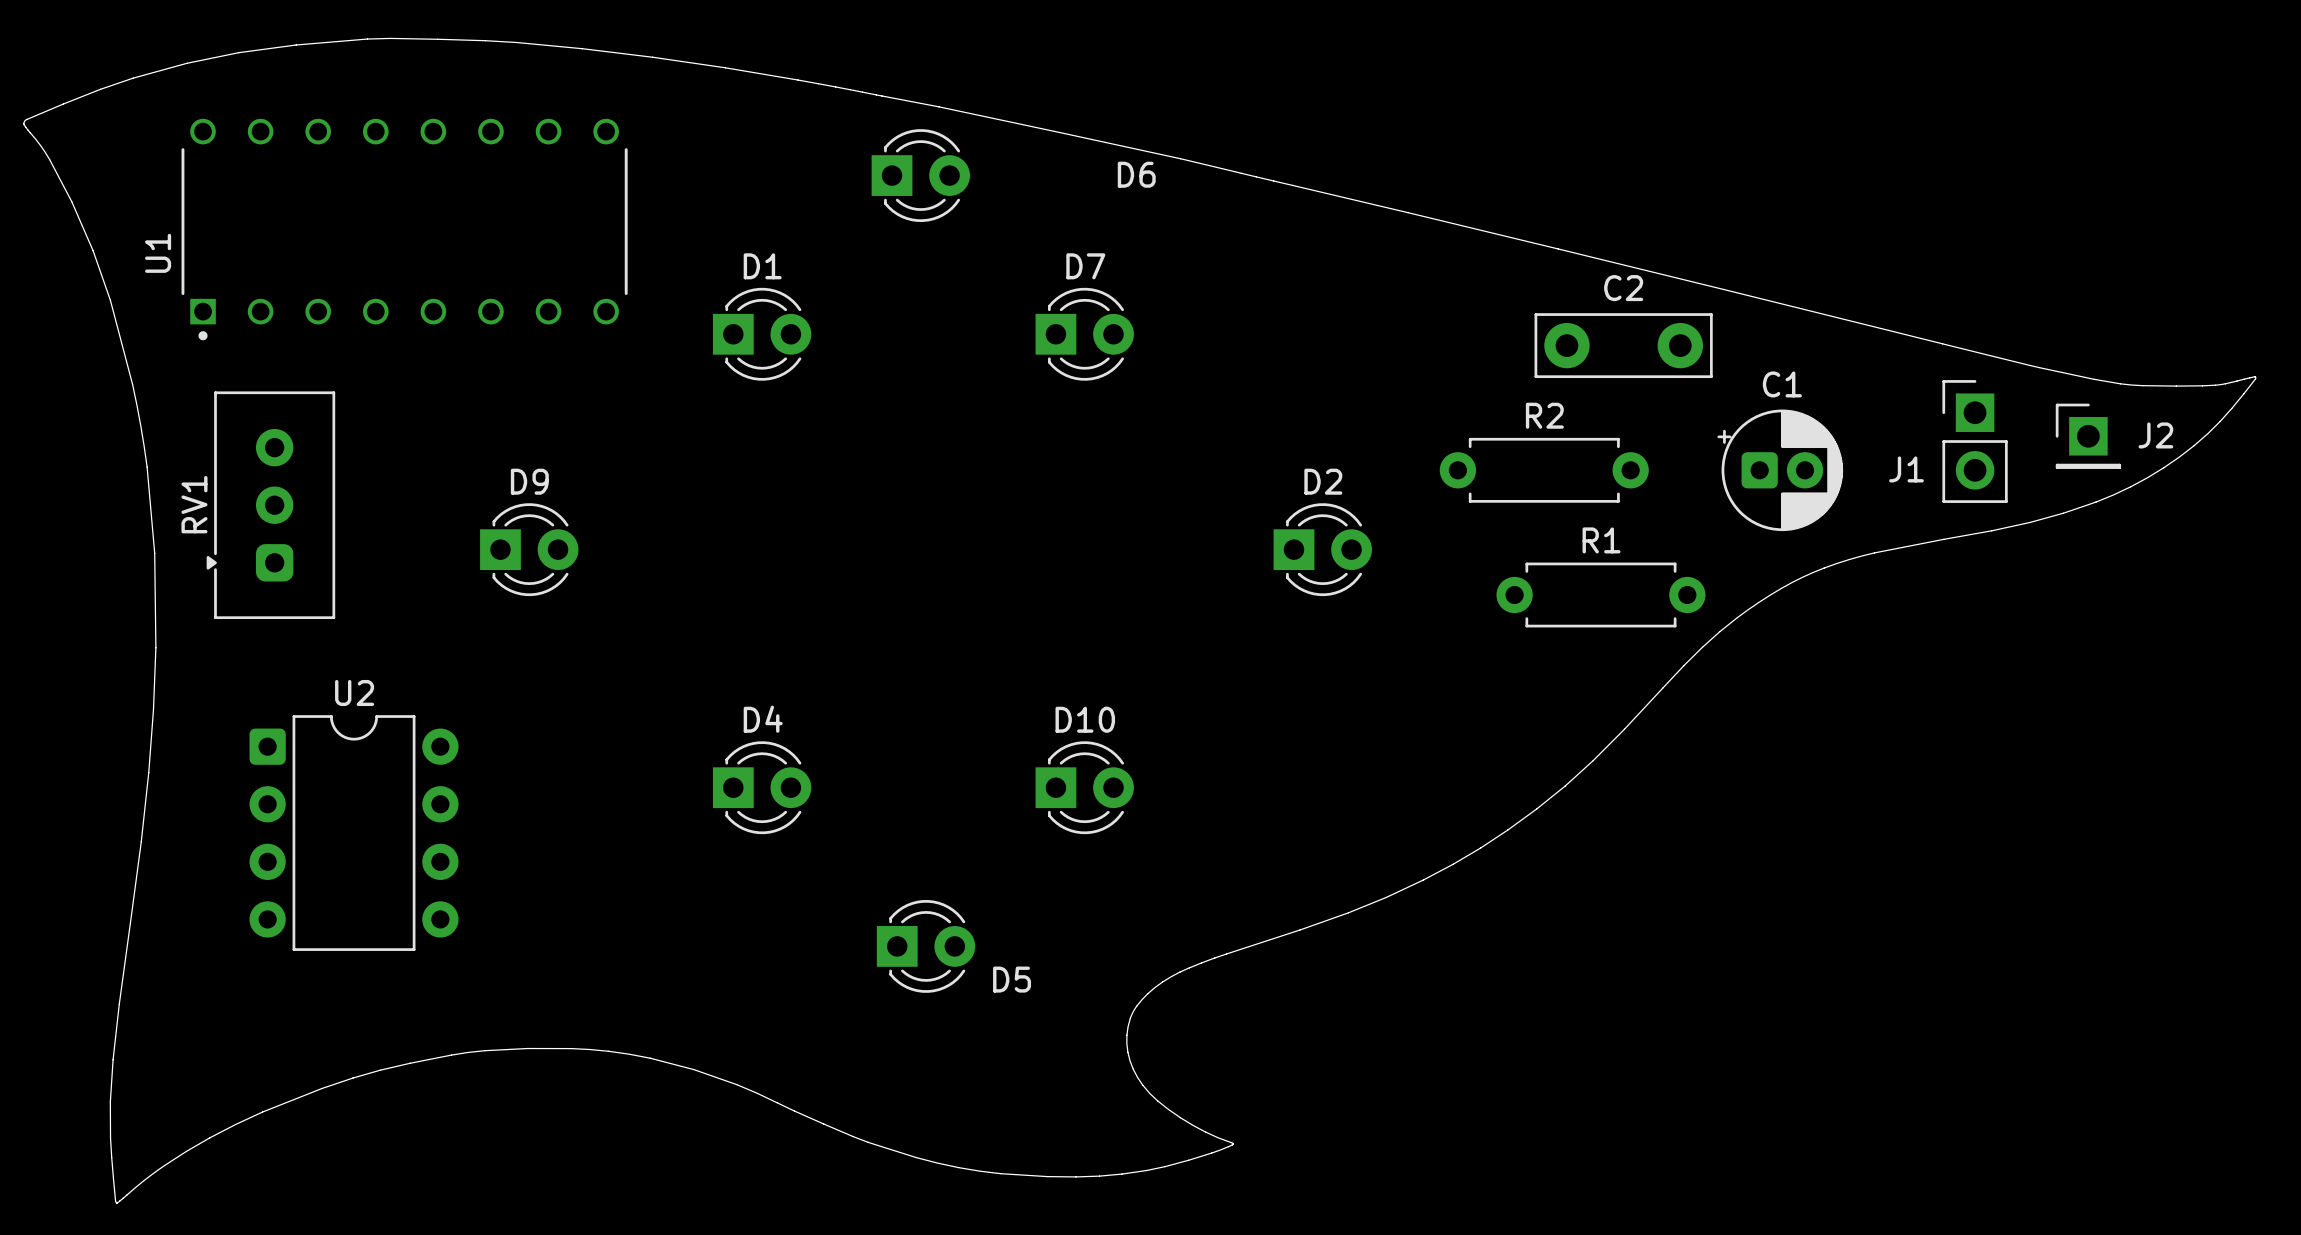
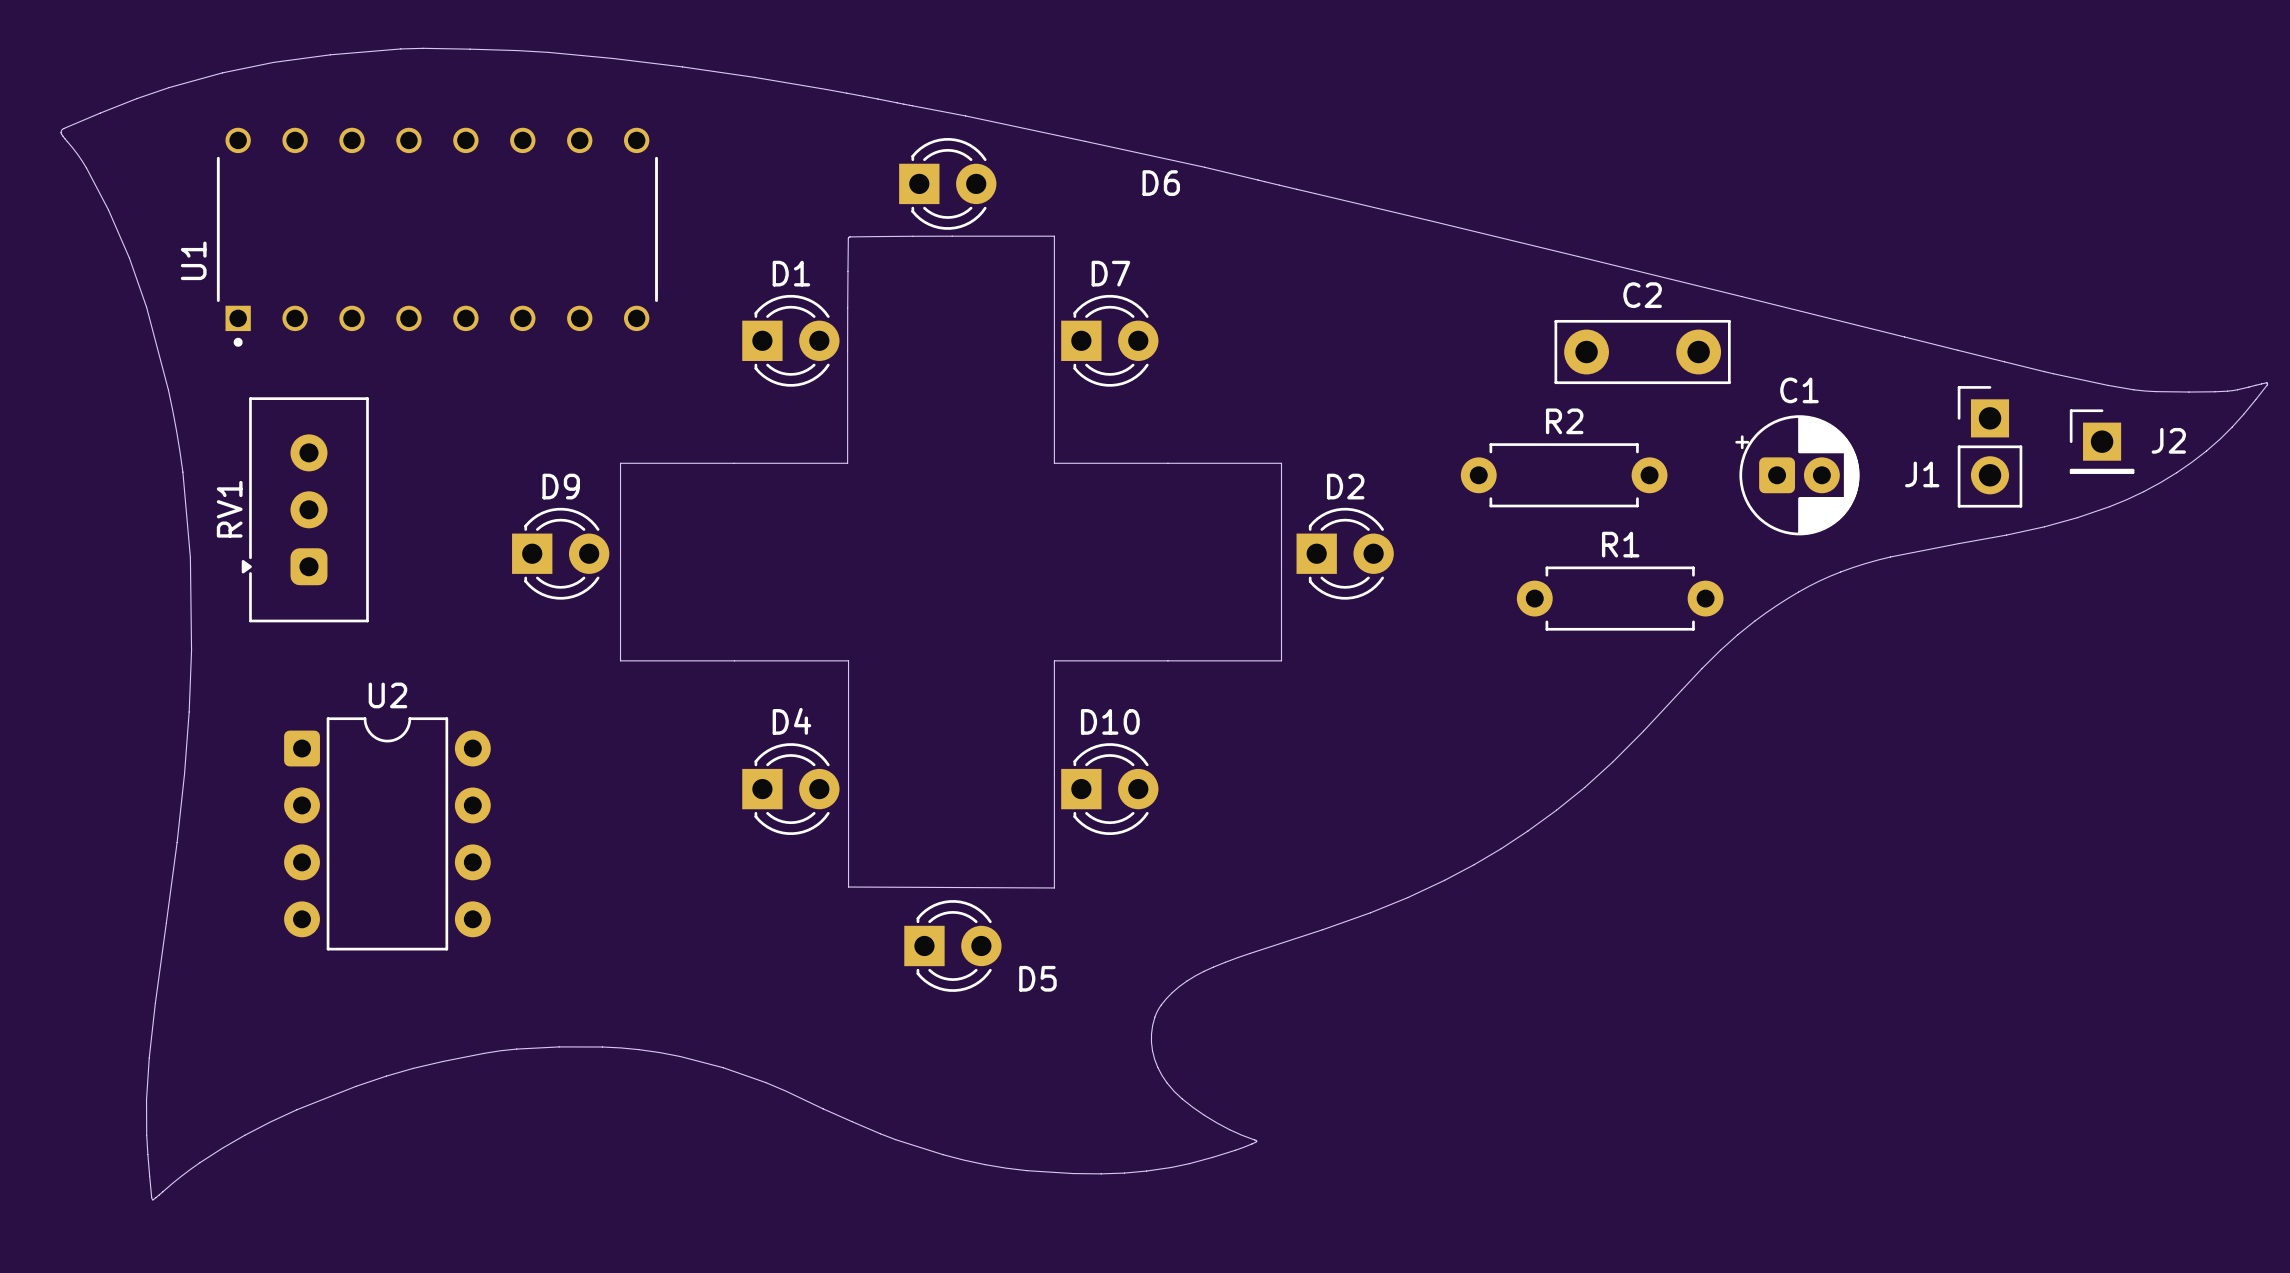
board edge: none -> (952, 236) (848, 237) (847, 463) (620, 463) (620, 660) (848, 660) (848, 887) (1054, 887) (1054, 660) (1281, 660) (1281, 463) (1054, 463) (1054, 236) (952, 236)

